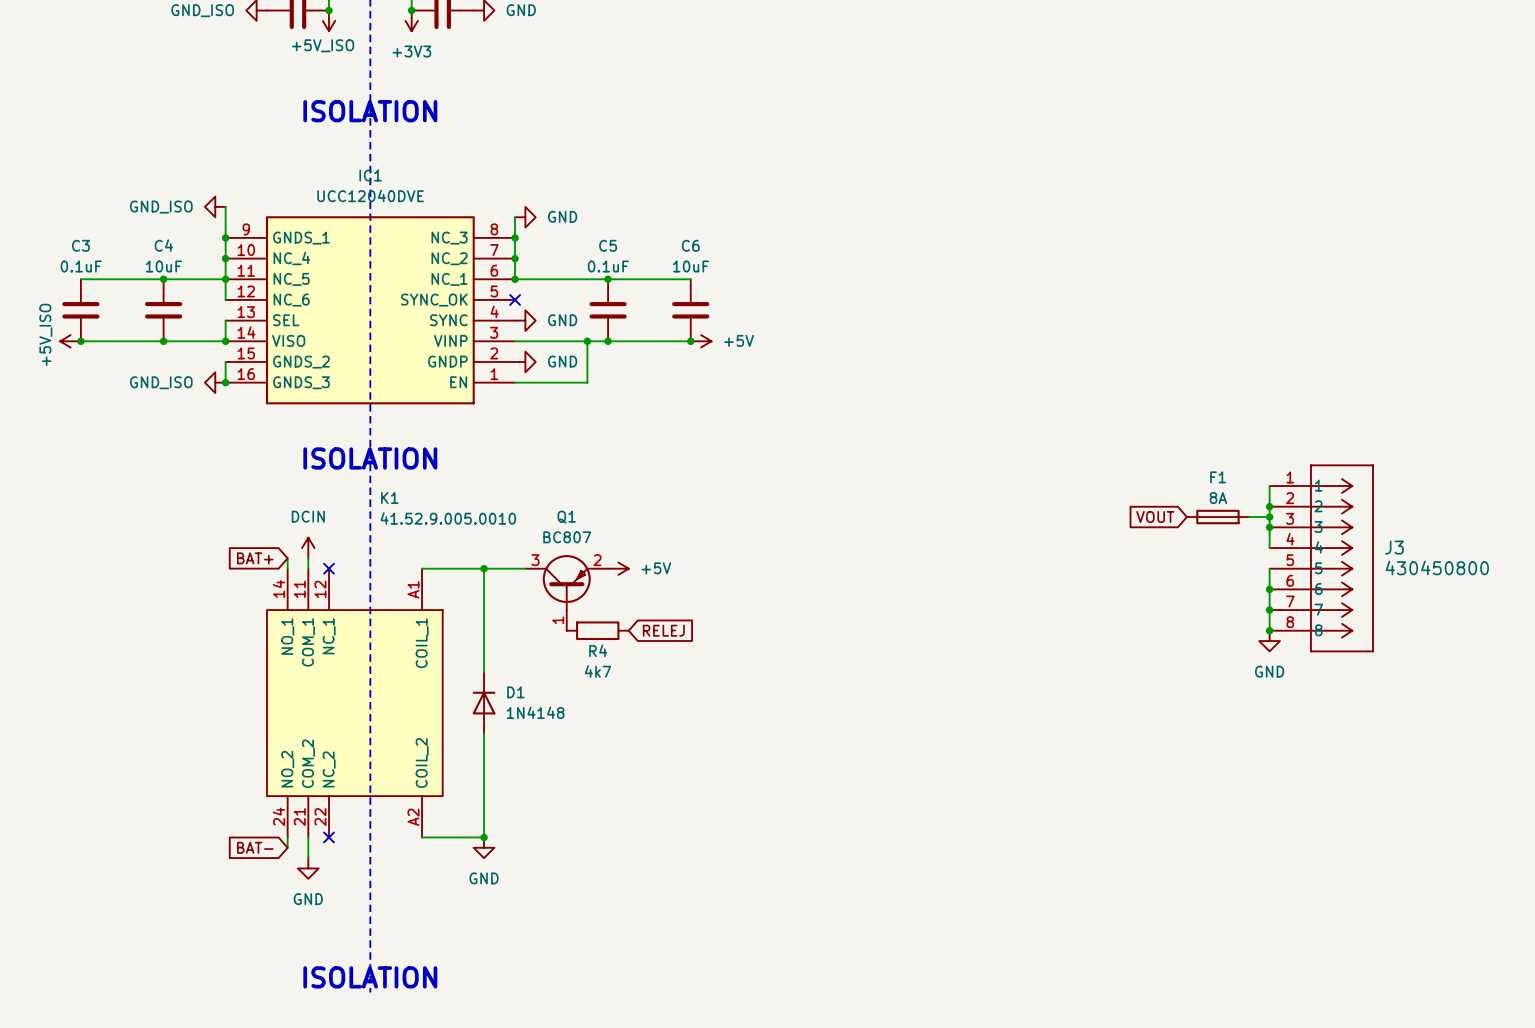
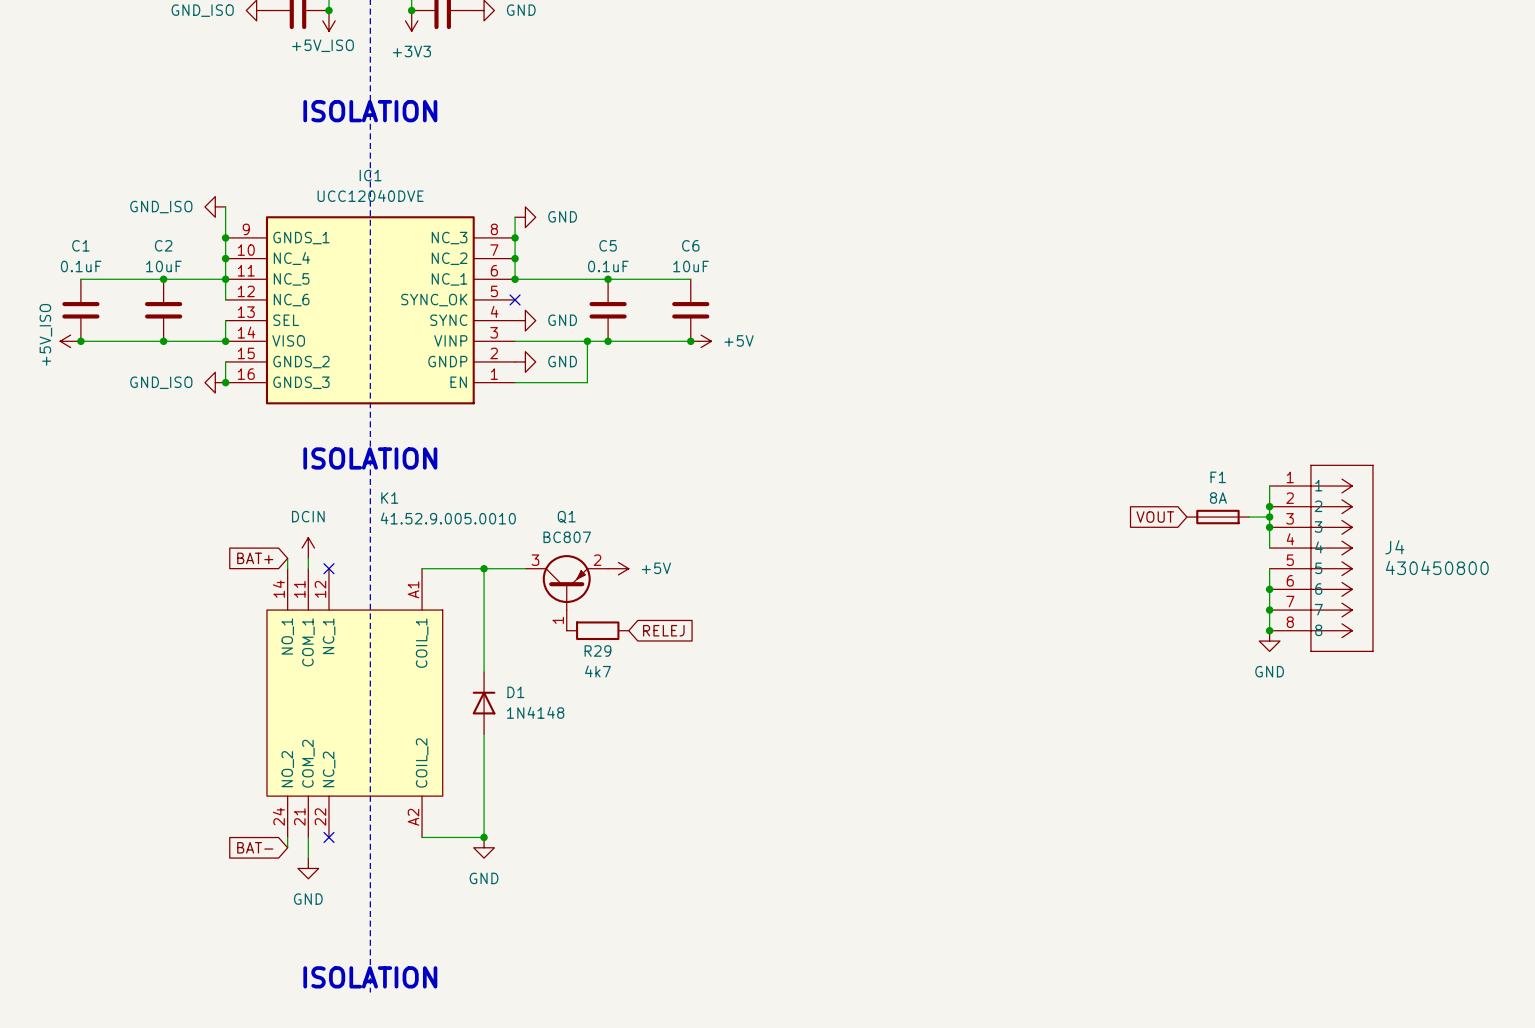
C3 name: C3 (80, 245) -> C1 (80, 245)
C4 name: C4 (163, 245) -> C2 (163, 245)
J3 name: J3 (1394, 547) -> J4 (1394, 547)
R4 name: R4 (598, 650) -> R29 (597, 651)

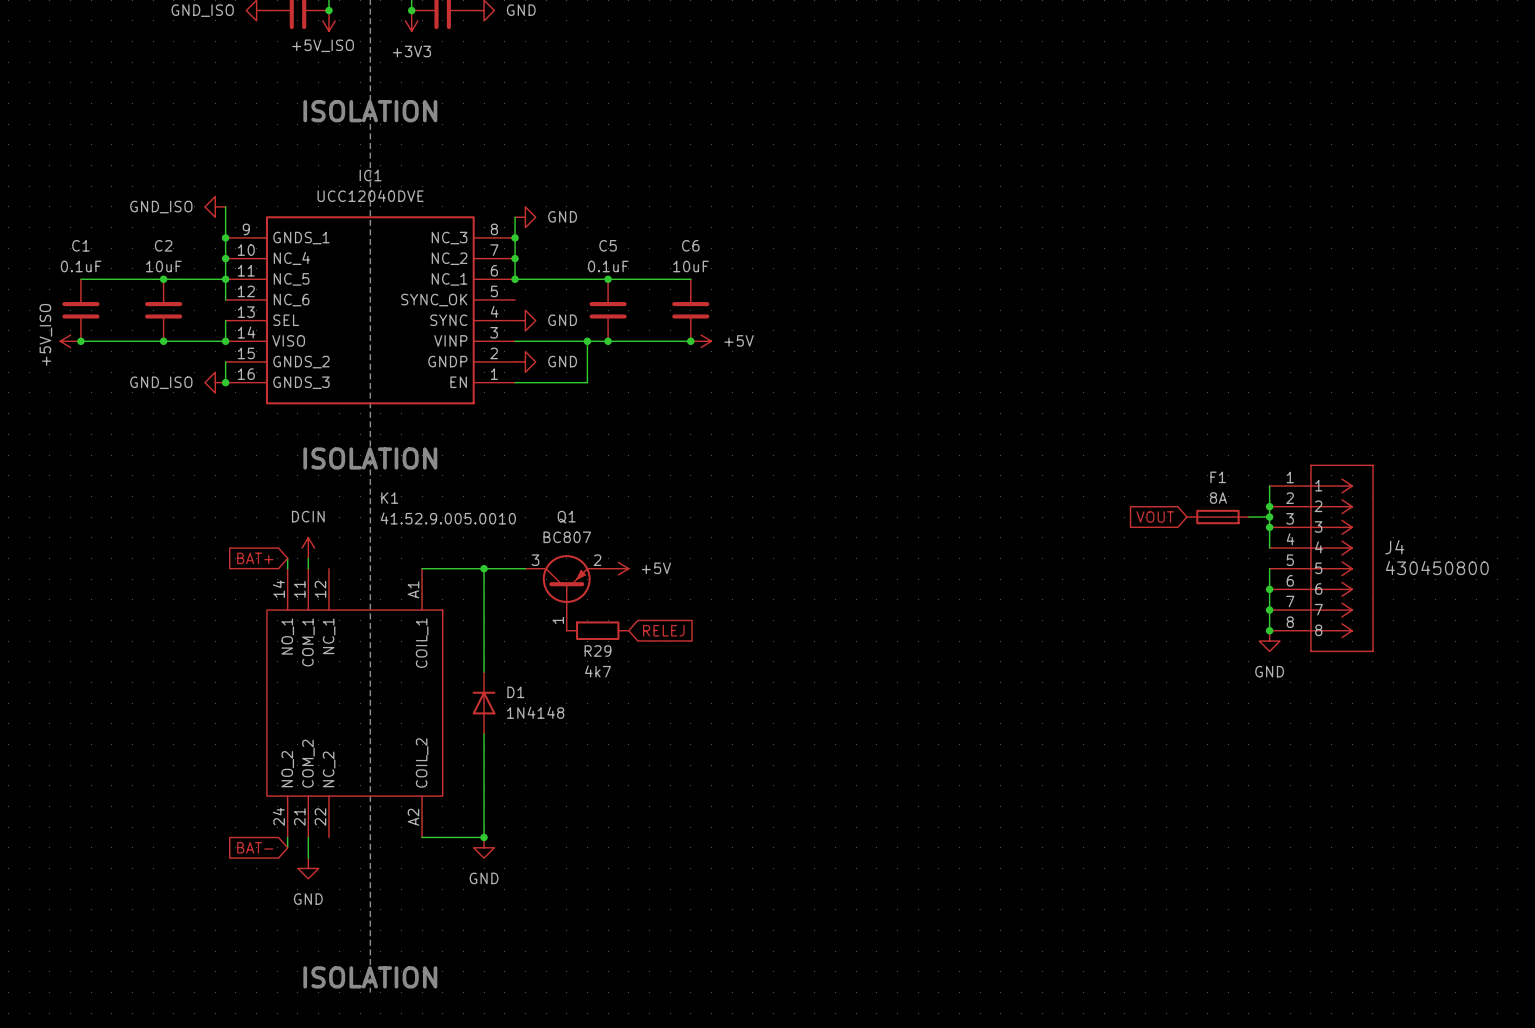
no-connect mark: (515, 299) -> none
K1 symbol: [266, 568, 444, 838] -> [266, 568, 444, 838]
no-connect mark: (328, 568) -> none
no-connect mark: (328, 837) -> none

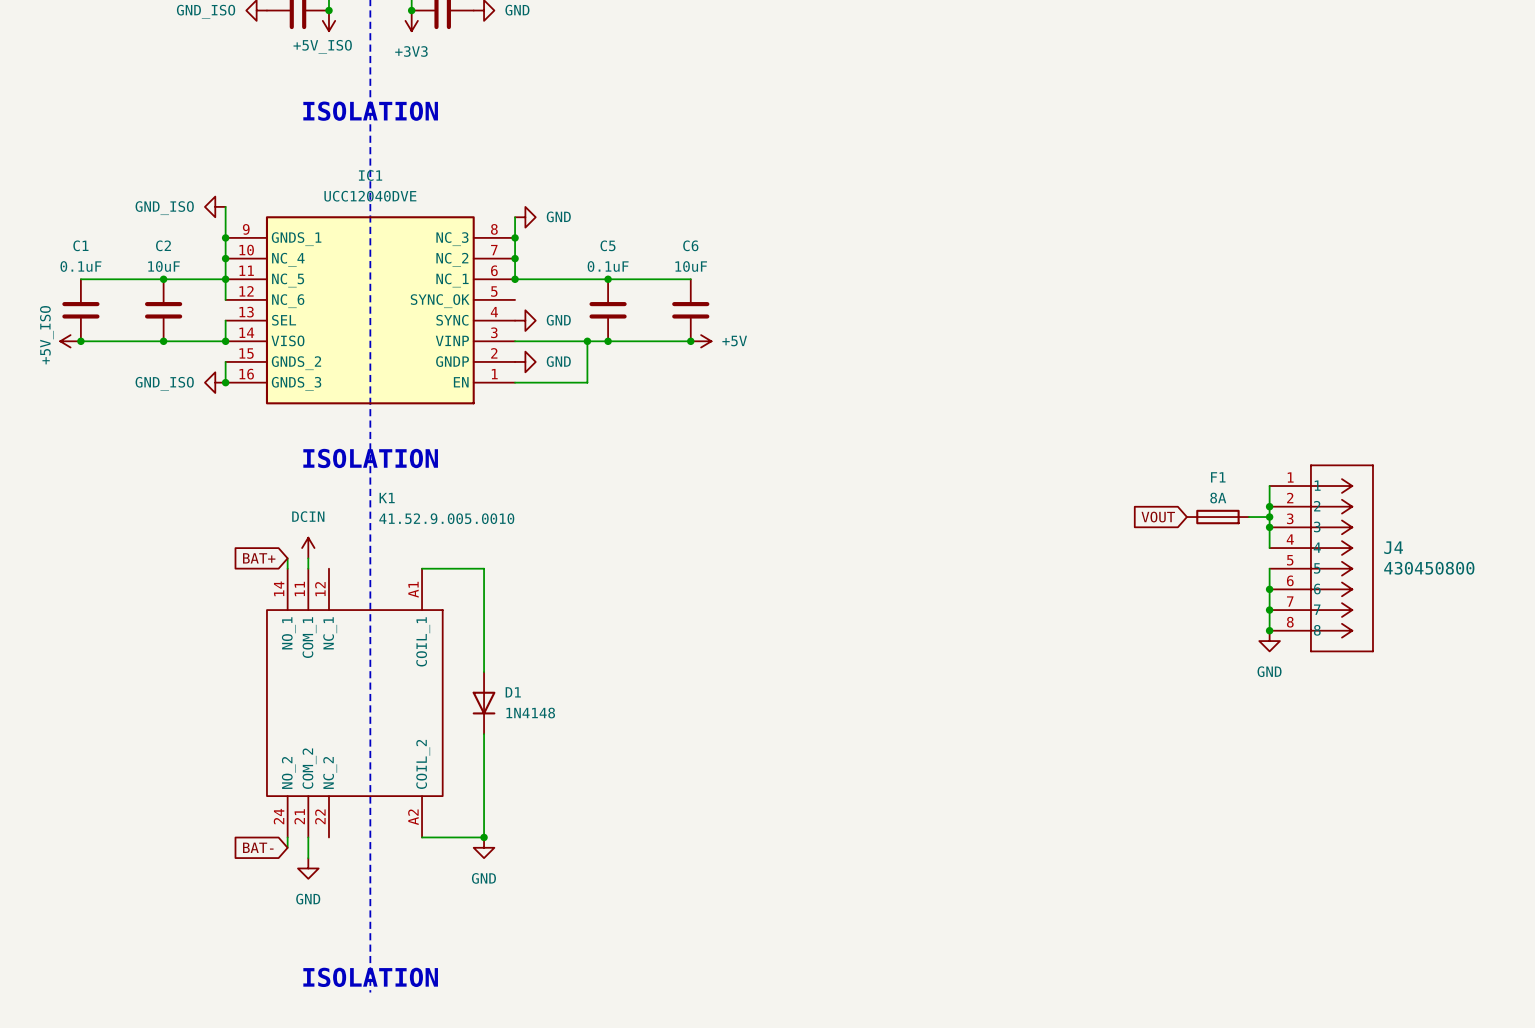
wire: (484, 568) (525, 568) -> none
junction: (484, 568) -> none
power symbol: +5V (618, 568) -> none
Q1: BC807 (566, 592) -> none
R29: 4k7 (597, 630) -> none
global label: RELEJ (663, 630) -> none
D1 rotation: 0° (484, 703) -> 180° (484, 703)

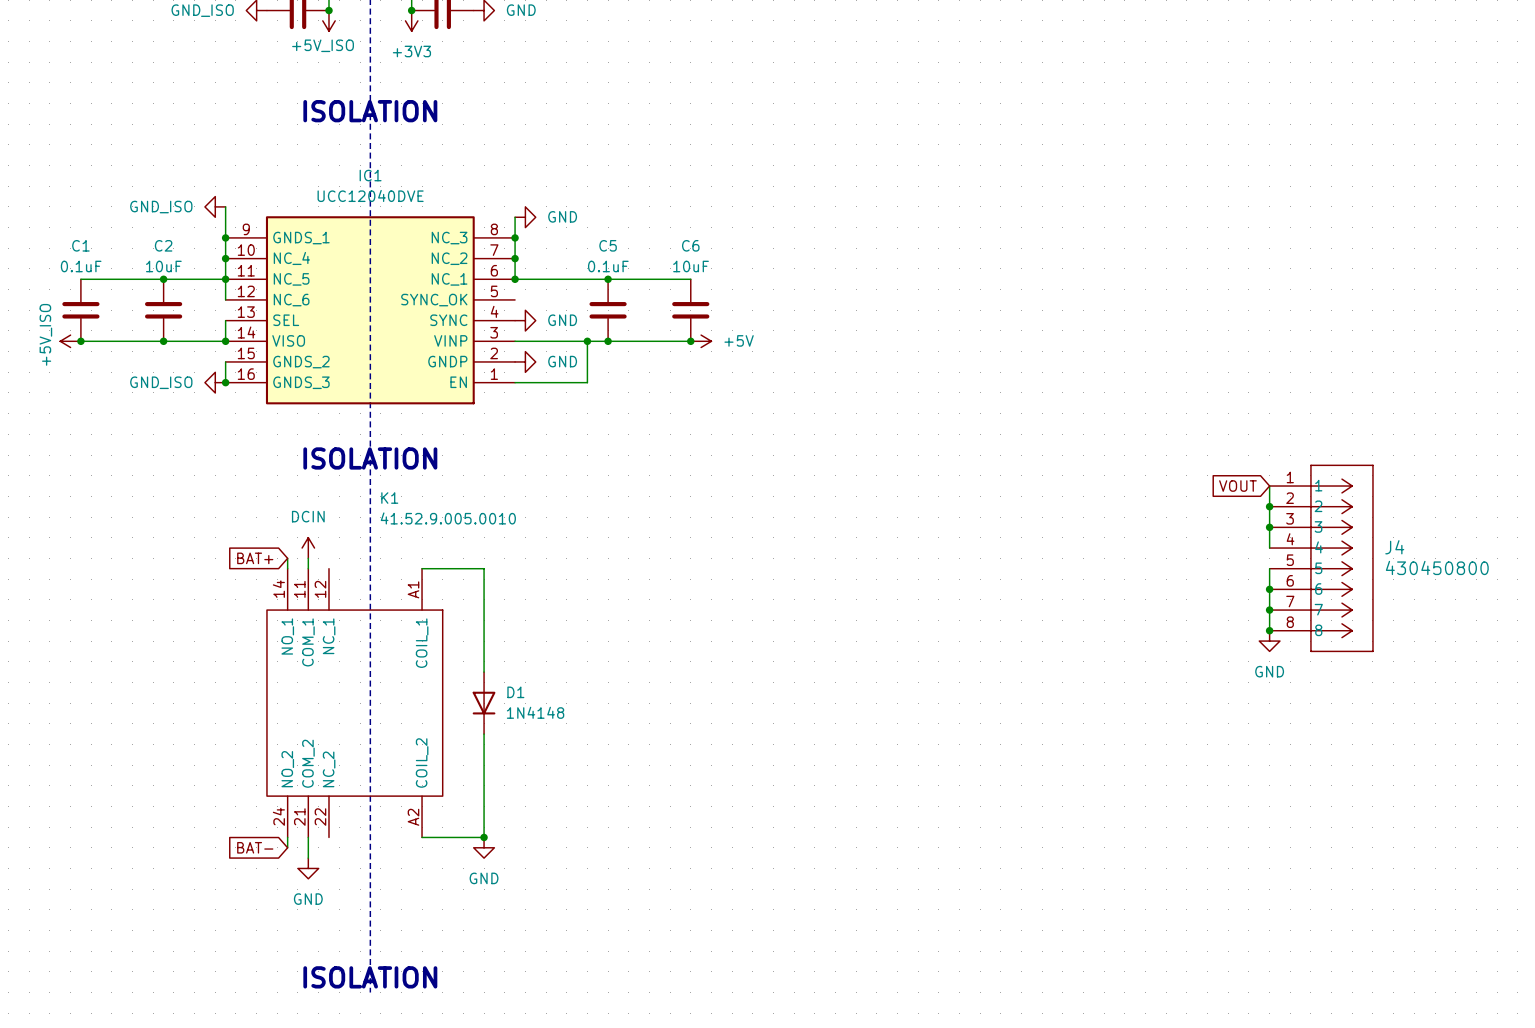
global label position: VOUT (1158, 517) -> VOUT (1237, 486)
F1: 8A (1217, 517) -> none
wire: (1248, 517) (1269, 517) -> none
junction: (1269, 517) -> none

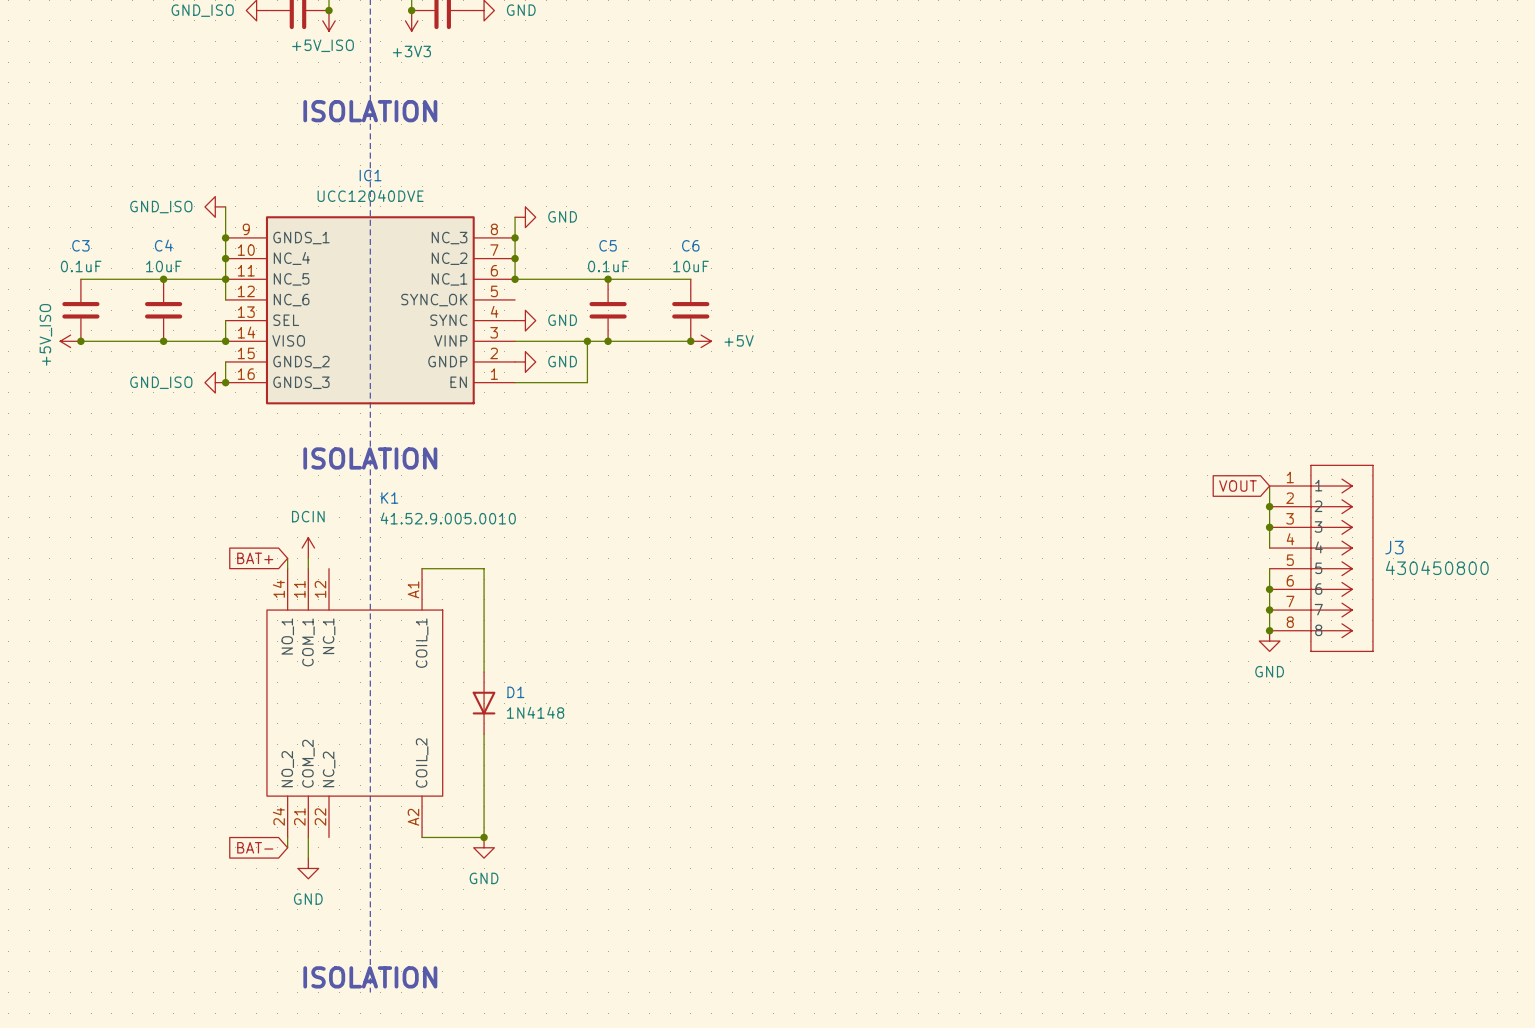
C1 name: C1 (80, 245) -> C3 (80, 245)
C2 name: C2 (163, 245) -> C4 (163, 245)
J4 name: J4 (1394, 547) -> J3 (1394, 547)

